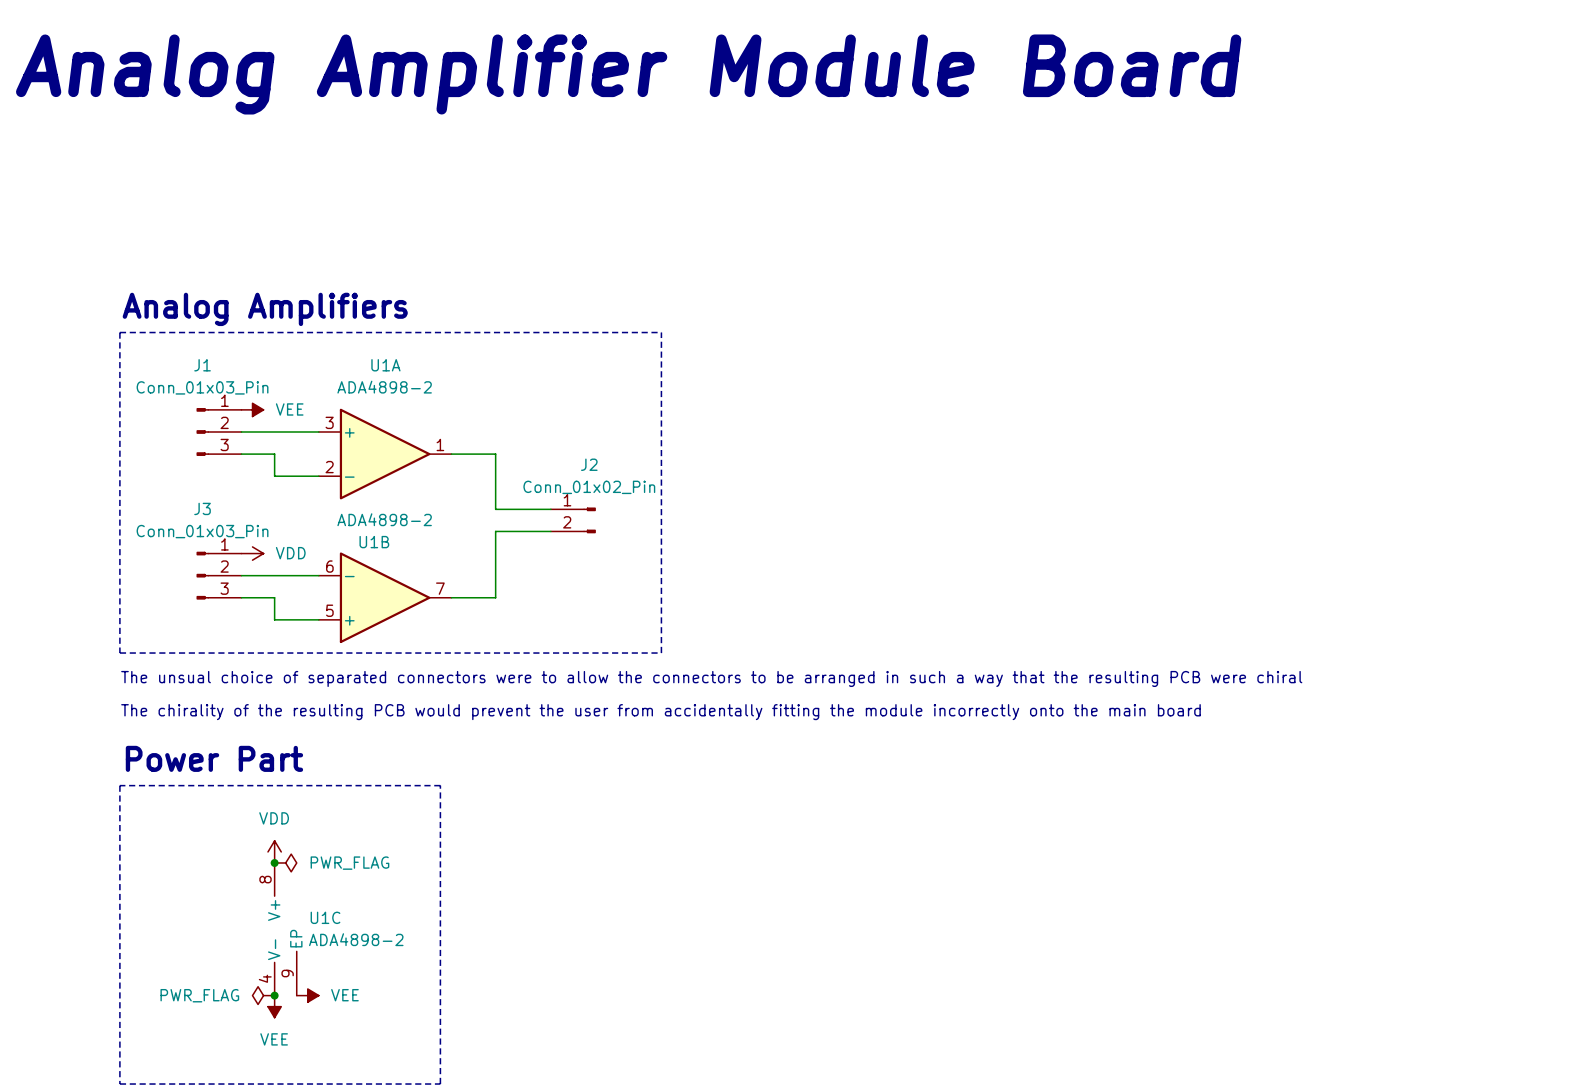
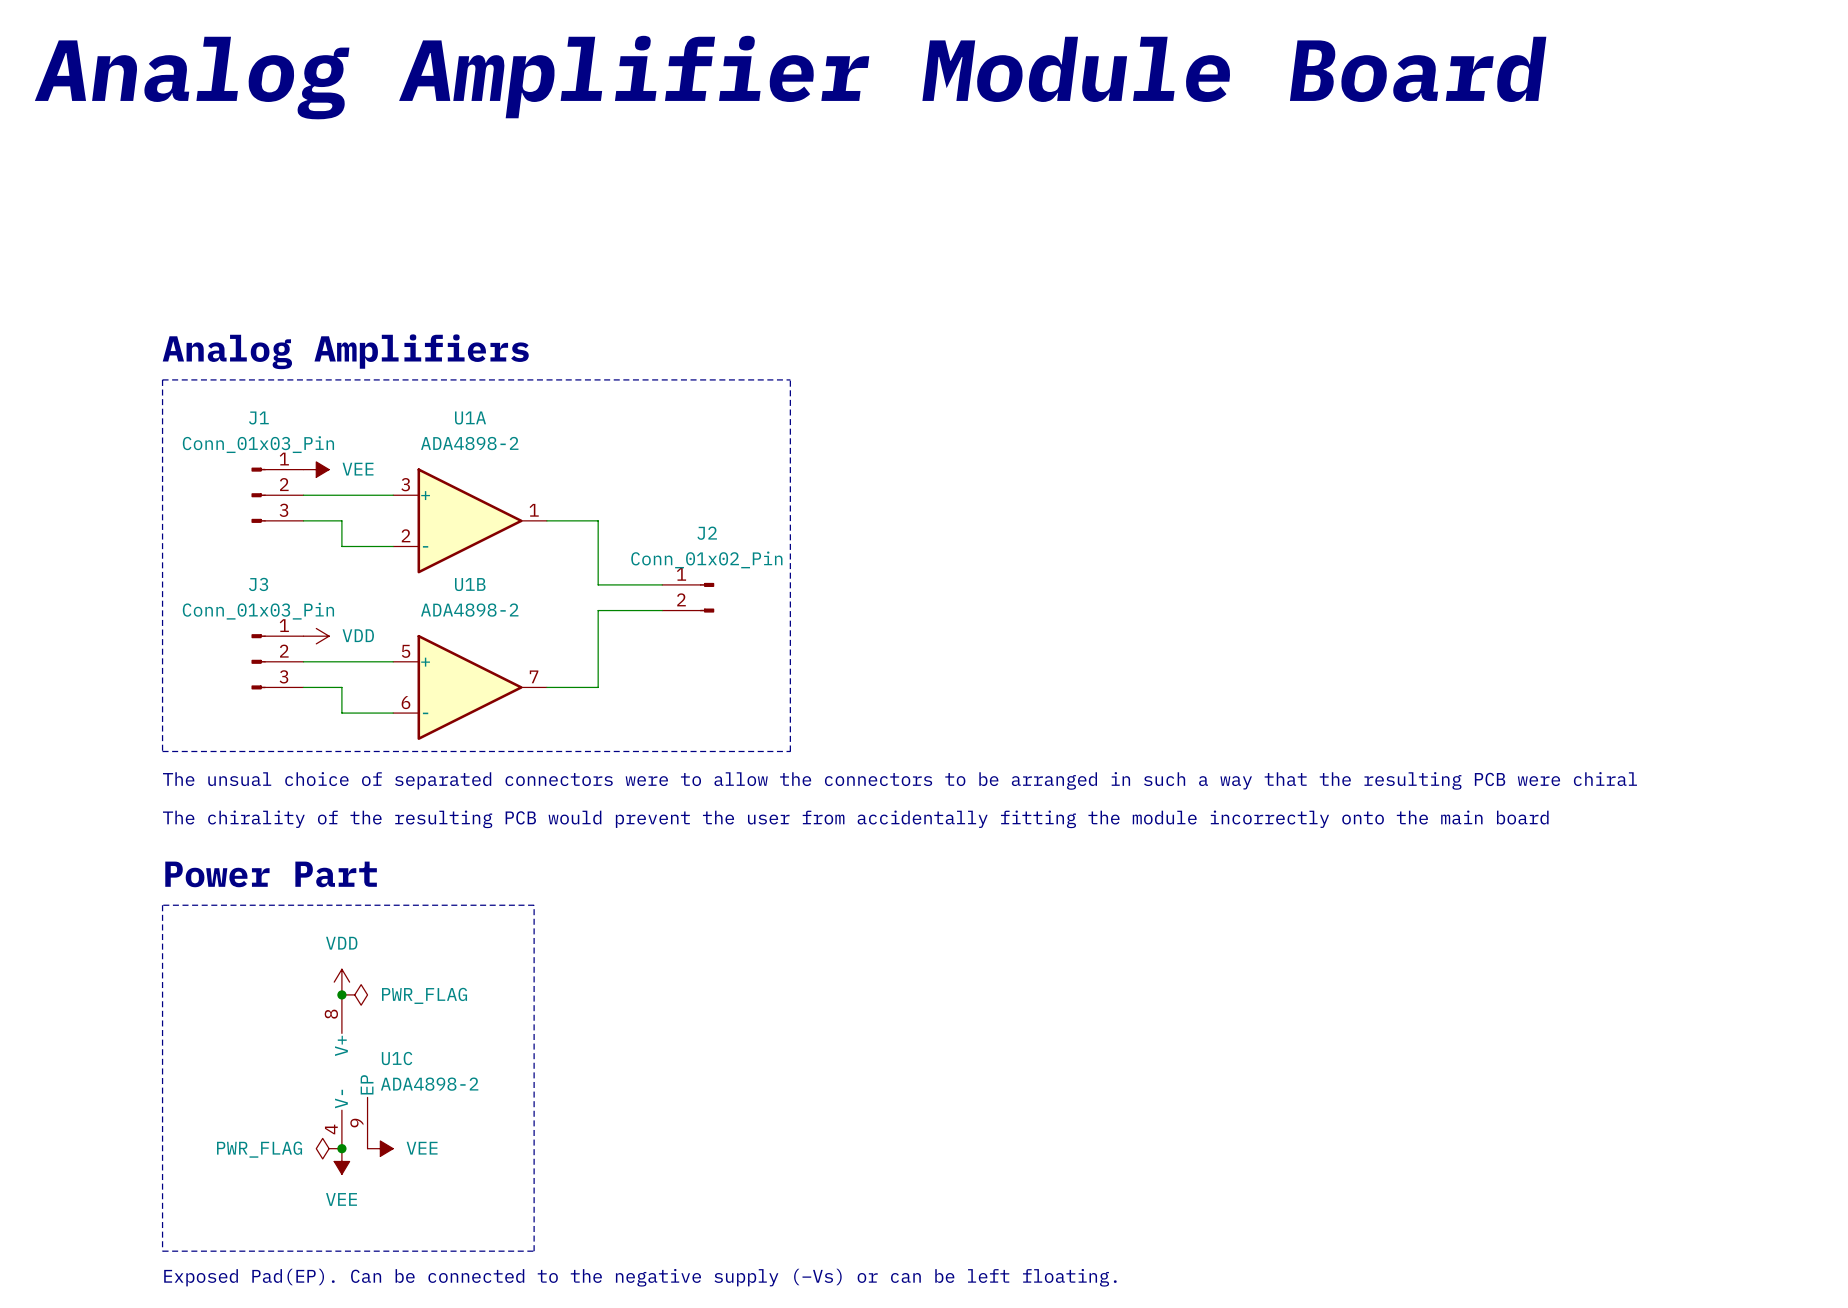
U1B name position: U1B (374, 542) -> U1B (470, 584)
U1B flip: as is (385, 597) -> up-down (470, 687)

